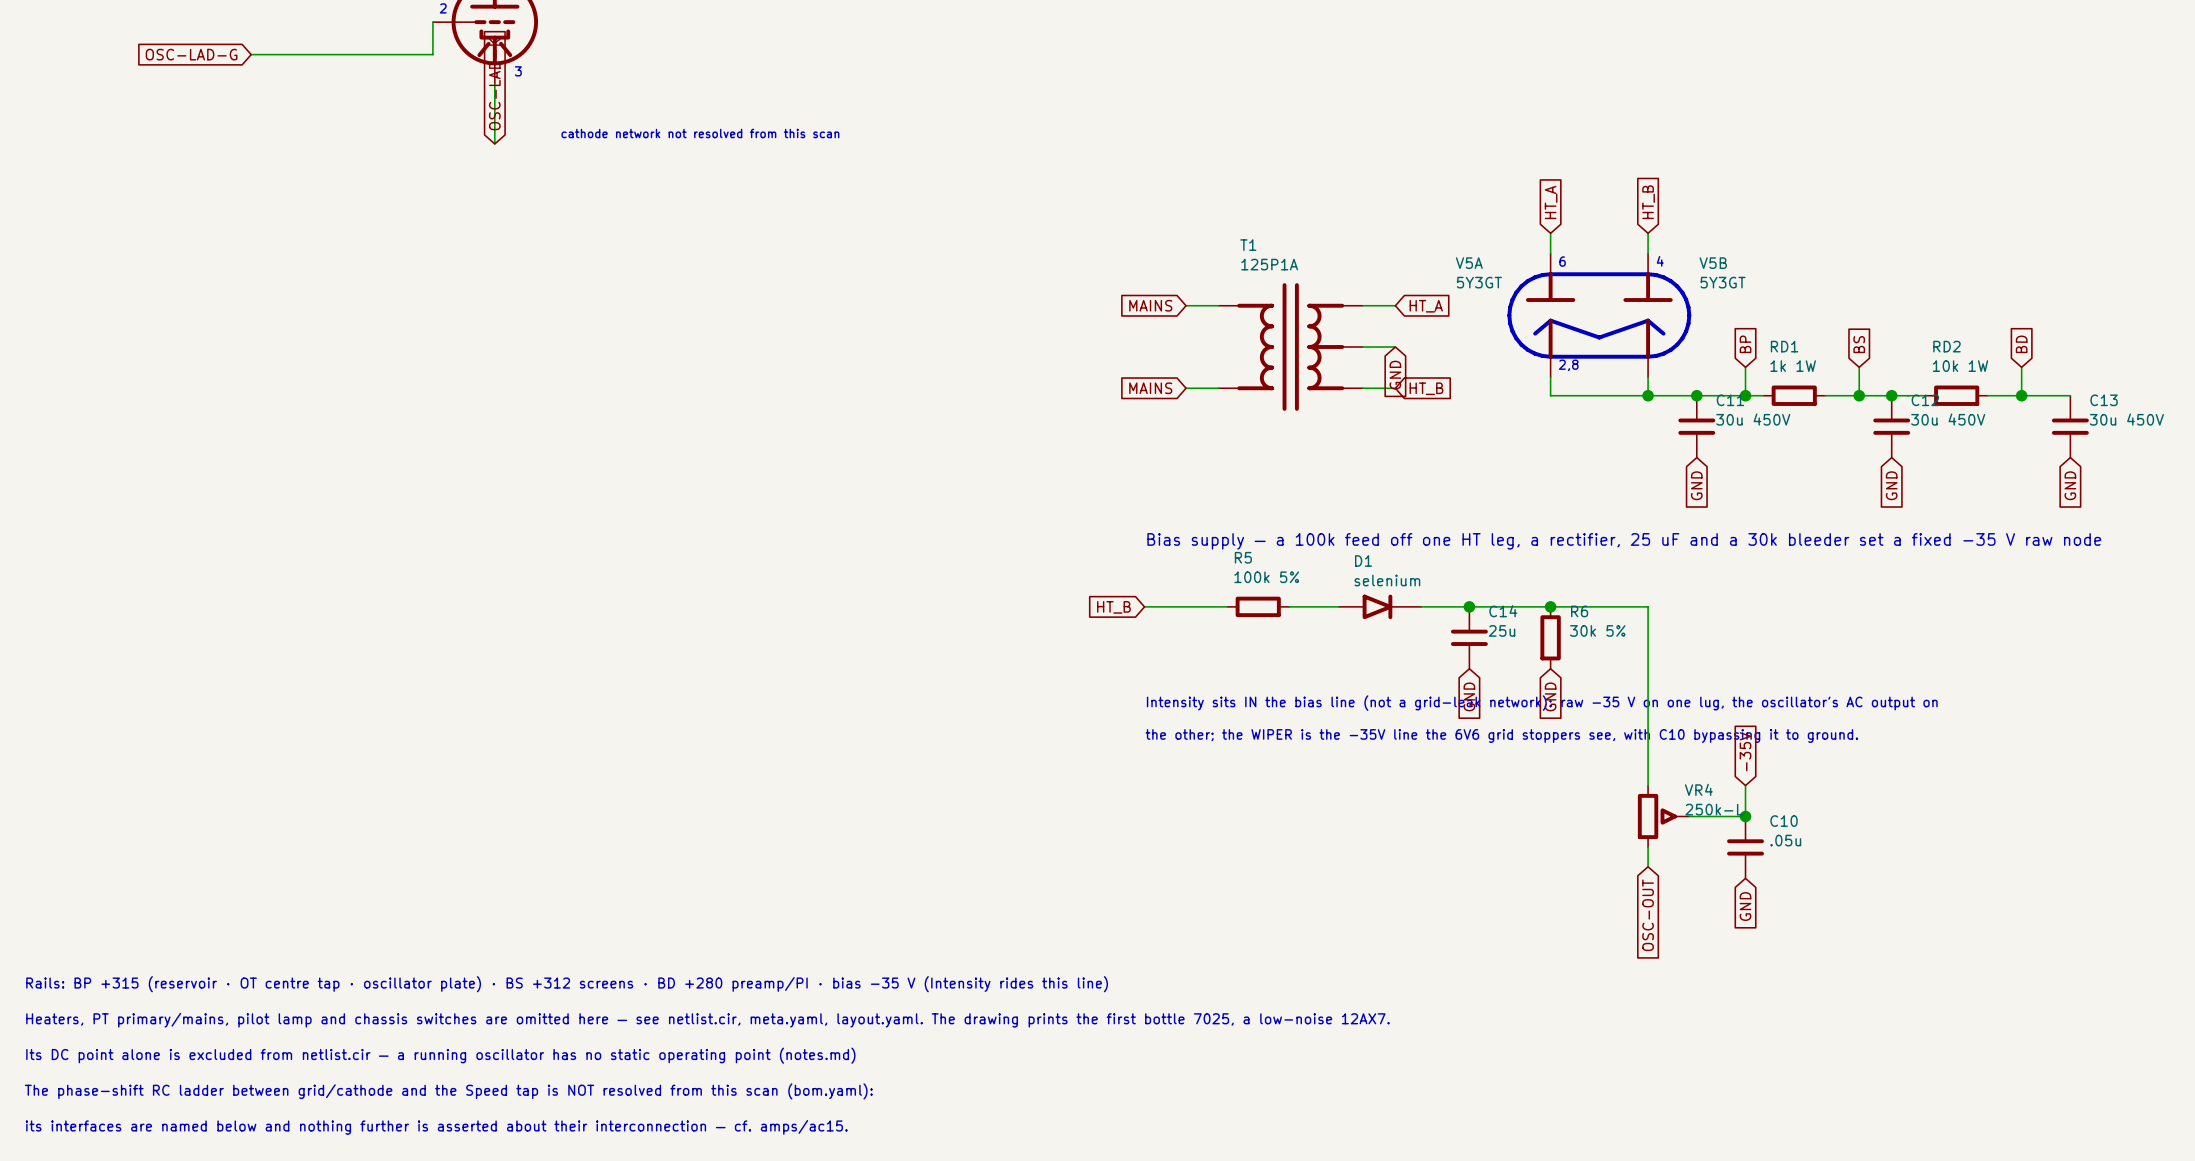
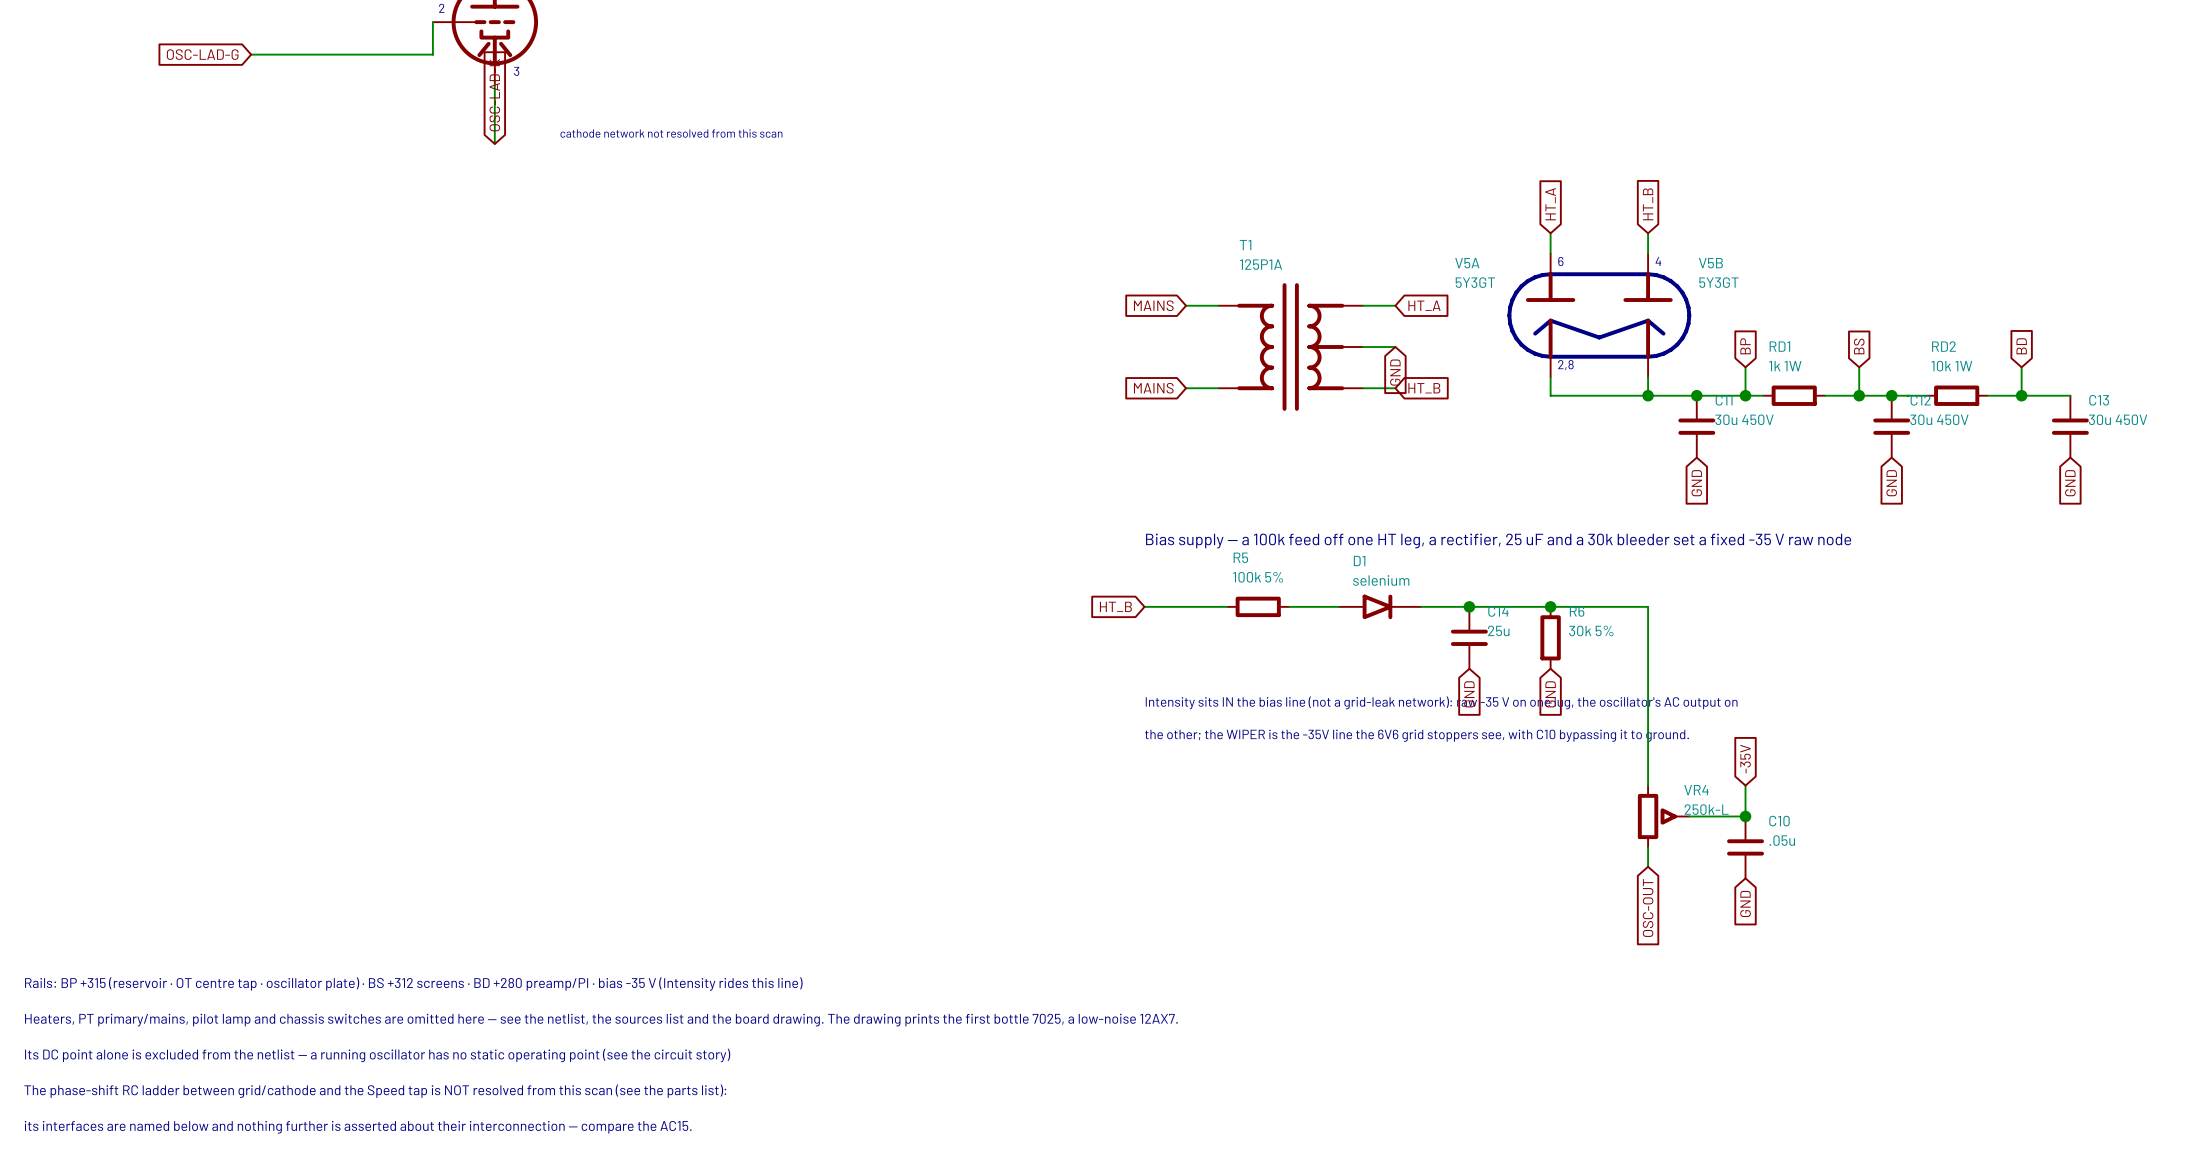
text: Heaters, PT primary/mains, pilot lamp and chassis switches are omitted here — see netlist.cir, meta.yaml, layout.yaml. The drawing prints the first bottle 7025, a low-noise 12AX7. (707, 1020) -> Heaters, PT primary/mains, pilot lamp and chassis switches are omitted here — see the netlist, the sources list and the board drawing. The drawing prints the first bottle 7025, a low-noise 12AX7. (601, 1020)
text: Its DC point alone is excluded from netlist.cir — a running oscillator has no static operating point (notes.md) (440, 1055) -> Its DC point alone is excluded from the netlist — a running oscillator has no static operating point (see the circuit story) (377, 1055)
text: The phase-shift RC ladder between grid/cathode and the Speed tap is NOT resolved from this scan (bom.yaml): (448, 1091) -> The phase-shift RC ladder between grid/cathode and the Speed tap is NOT resolved from this scan (see the parts list): (375, 1091)
text: its interfaces are named below and nothing further is asserted about their interconnection — cf. amps/ac15. (436, 1127) -> its interfaces are named below and nothing further is asserted about their interconnection — compare the AC15. (358, 1127)

